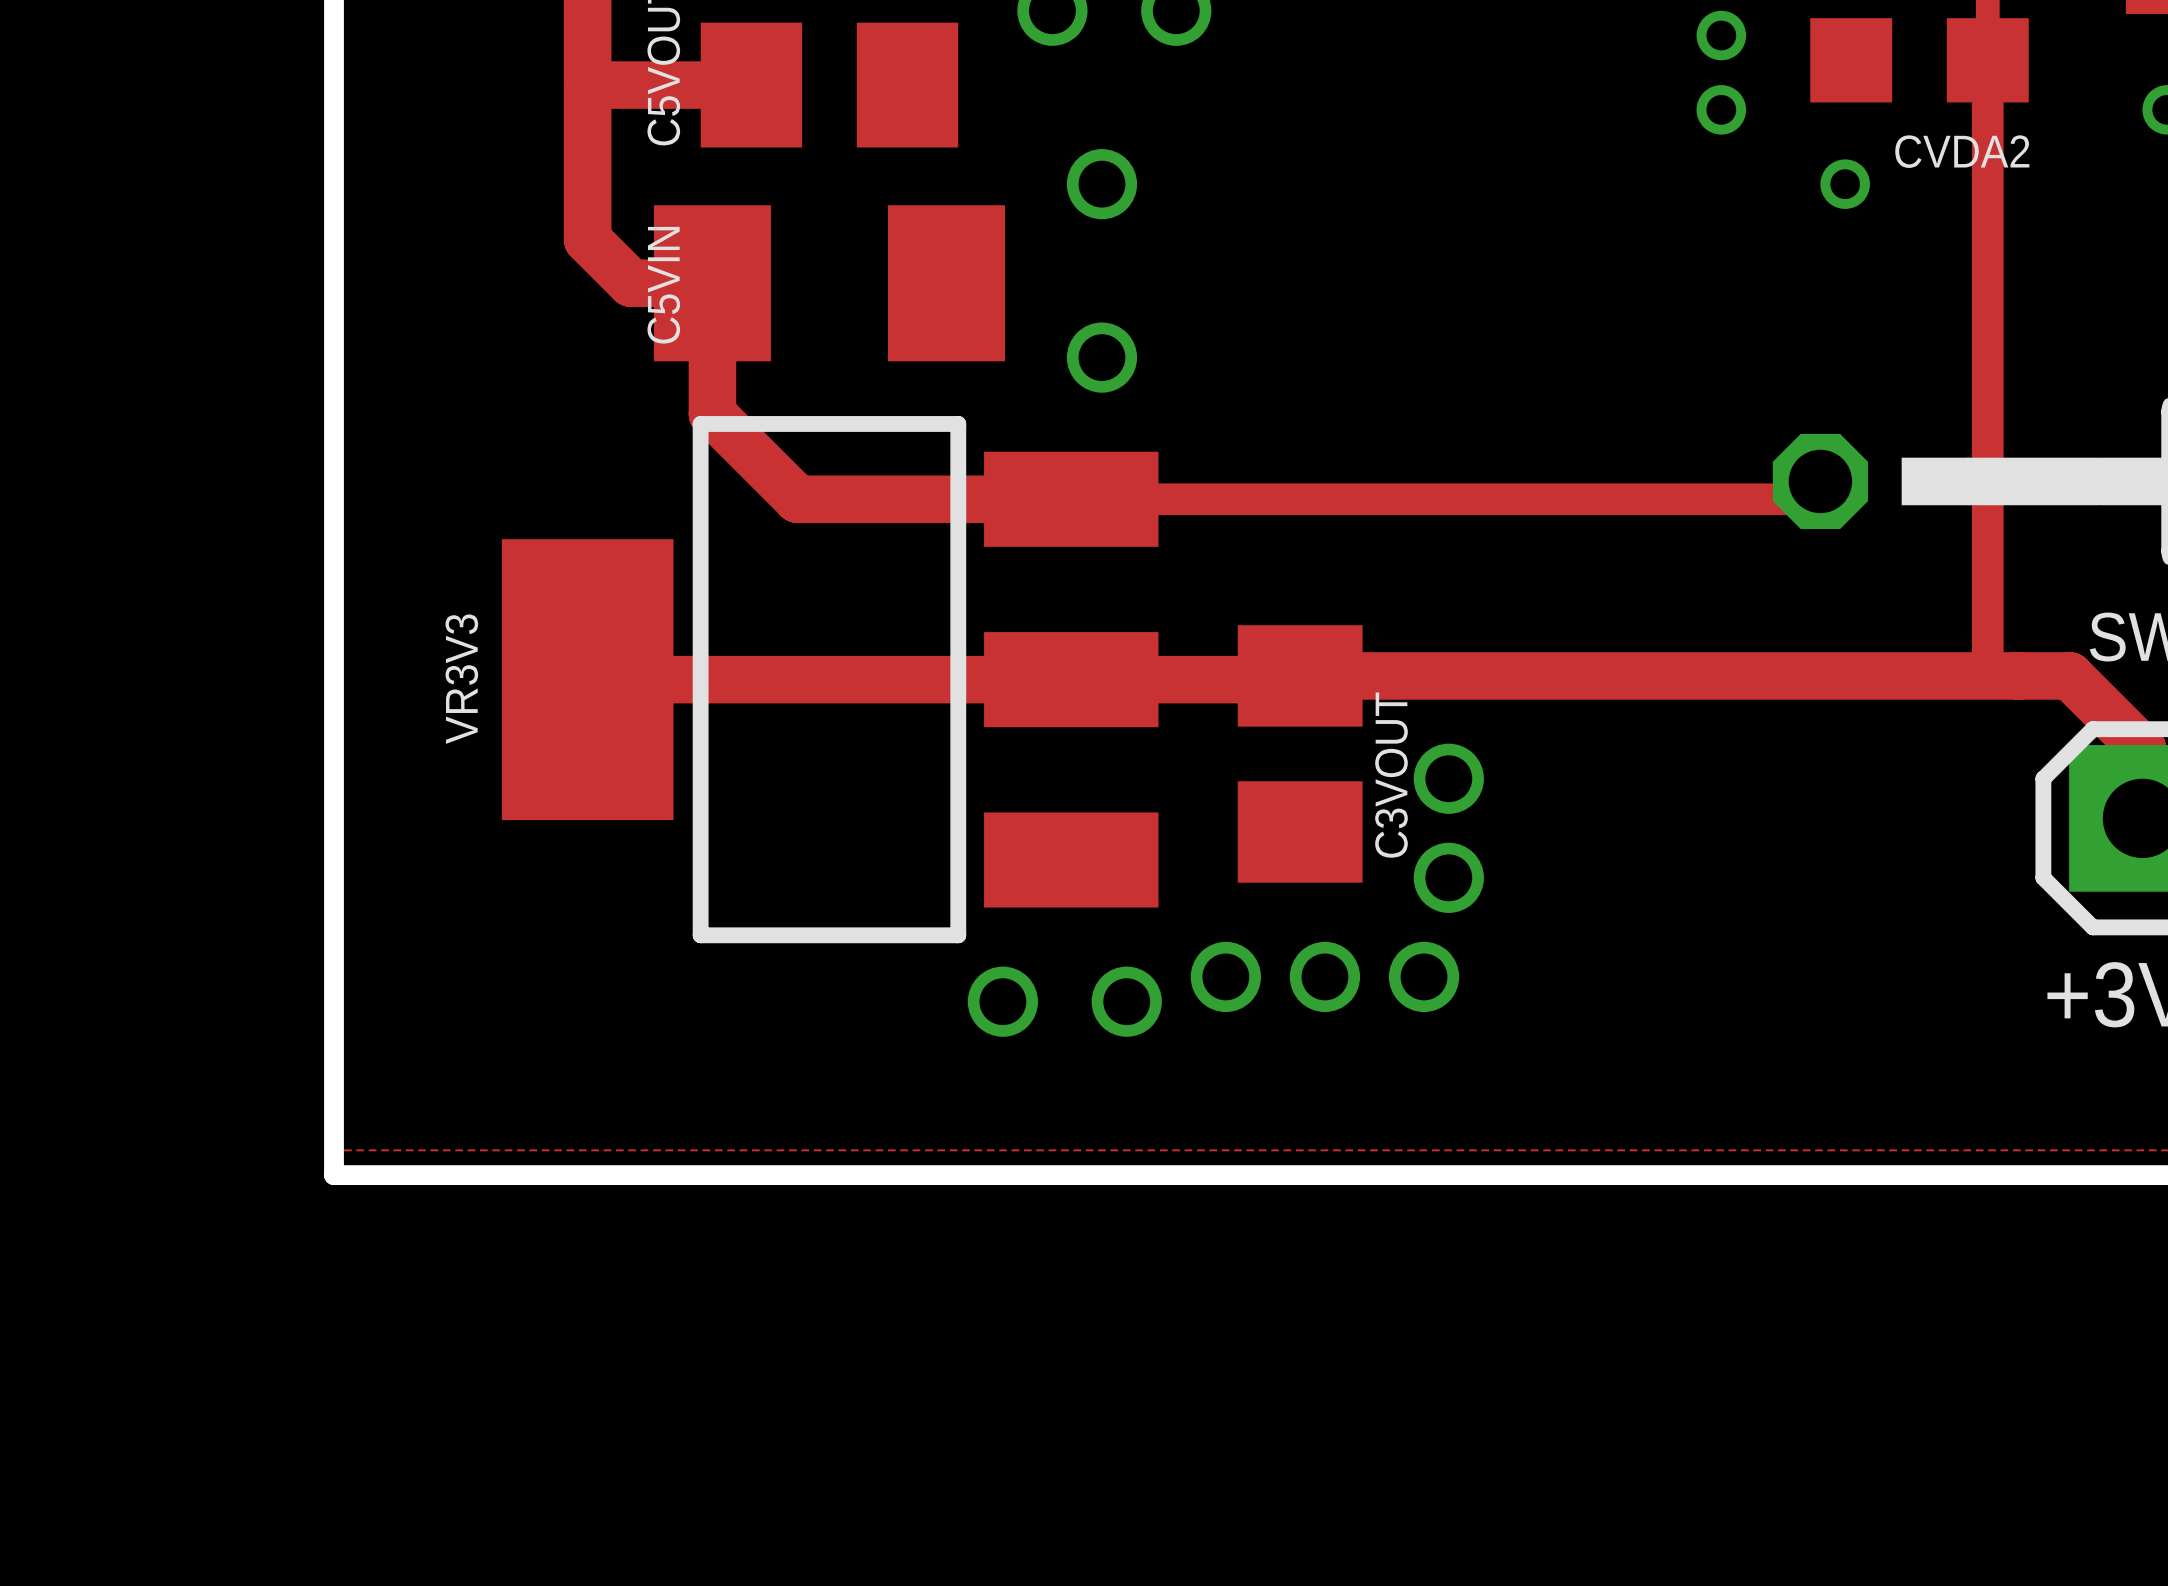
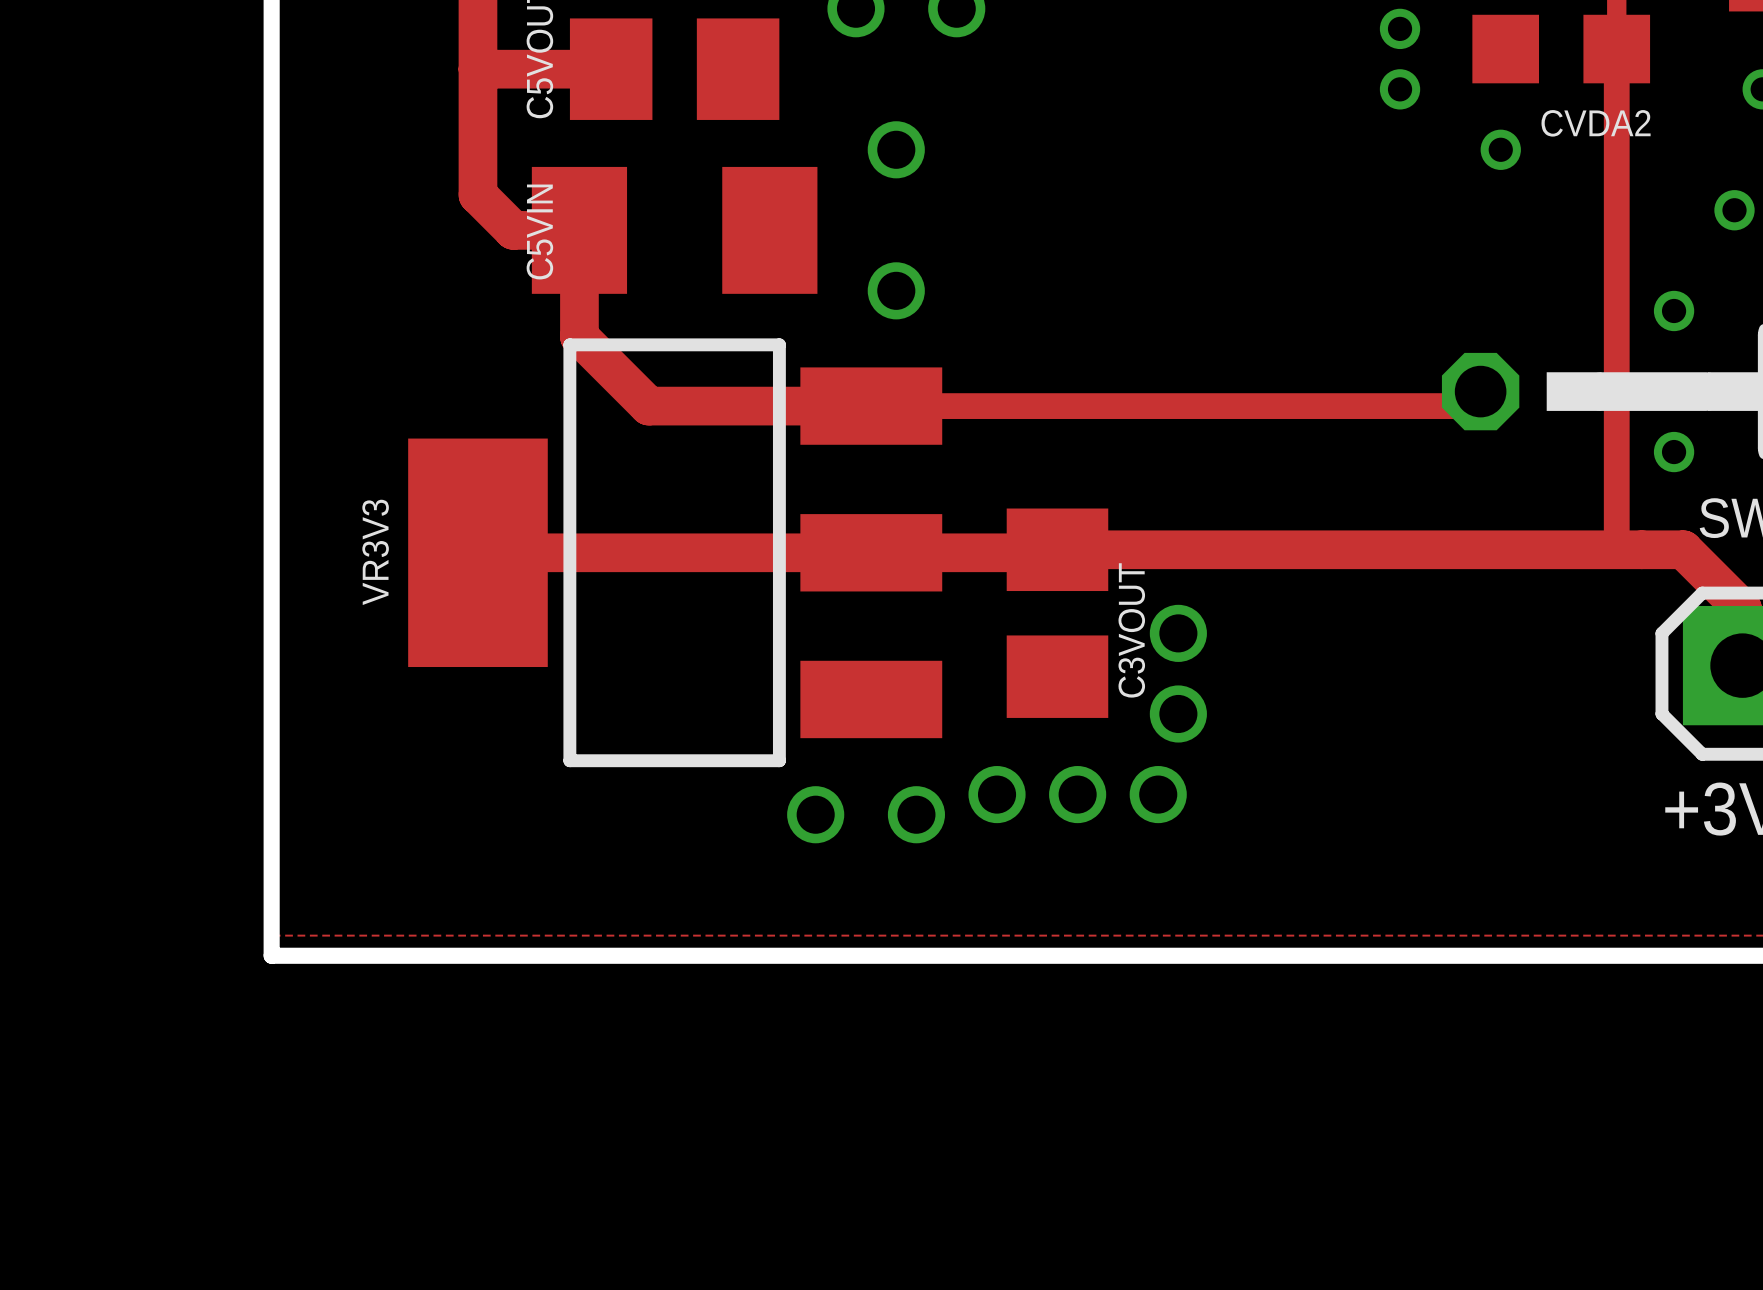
via: none -> (1734, 210)
via: none -> (1674, 310)
via: none -> (1674, 452)

